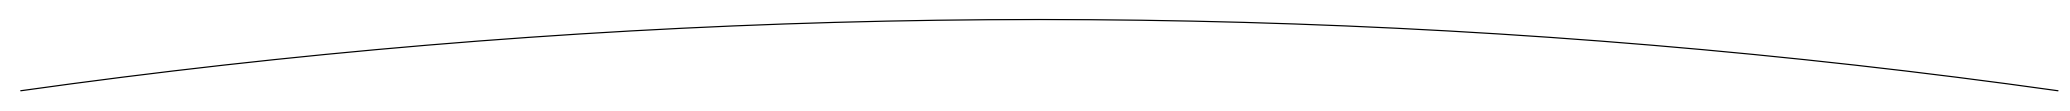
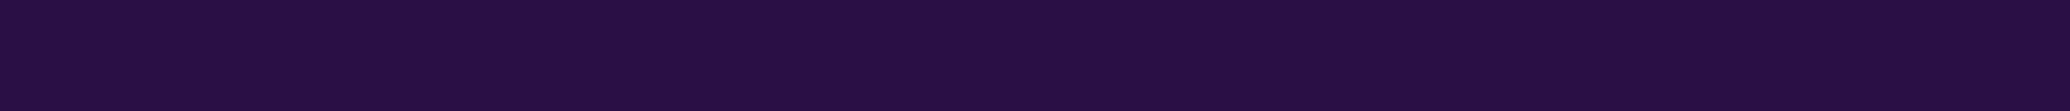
board edge: (20, 90) (274, 59) (528, 37) (783, 23) (1039, 19) (1294, 23) (1549, 37) (1804, 59) (2058, 90) -> none

